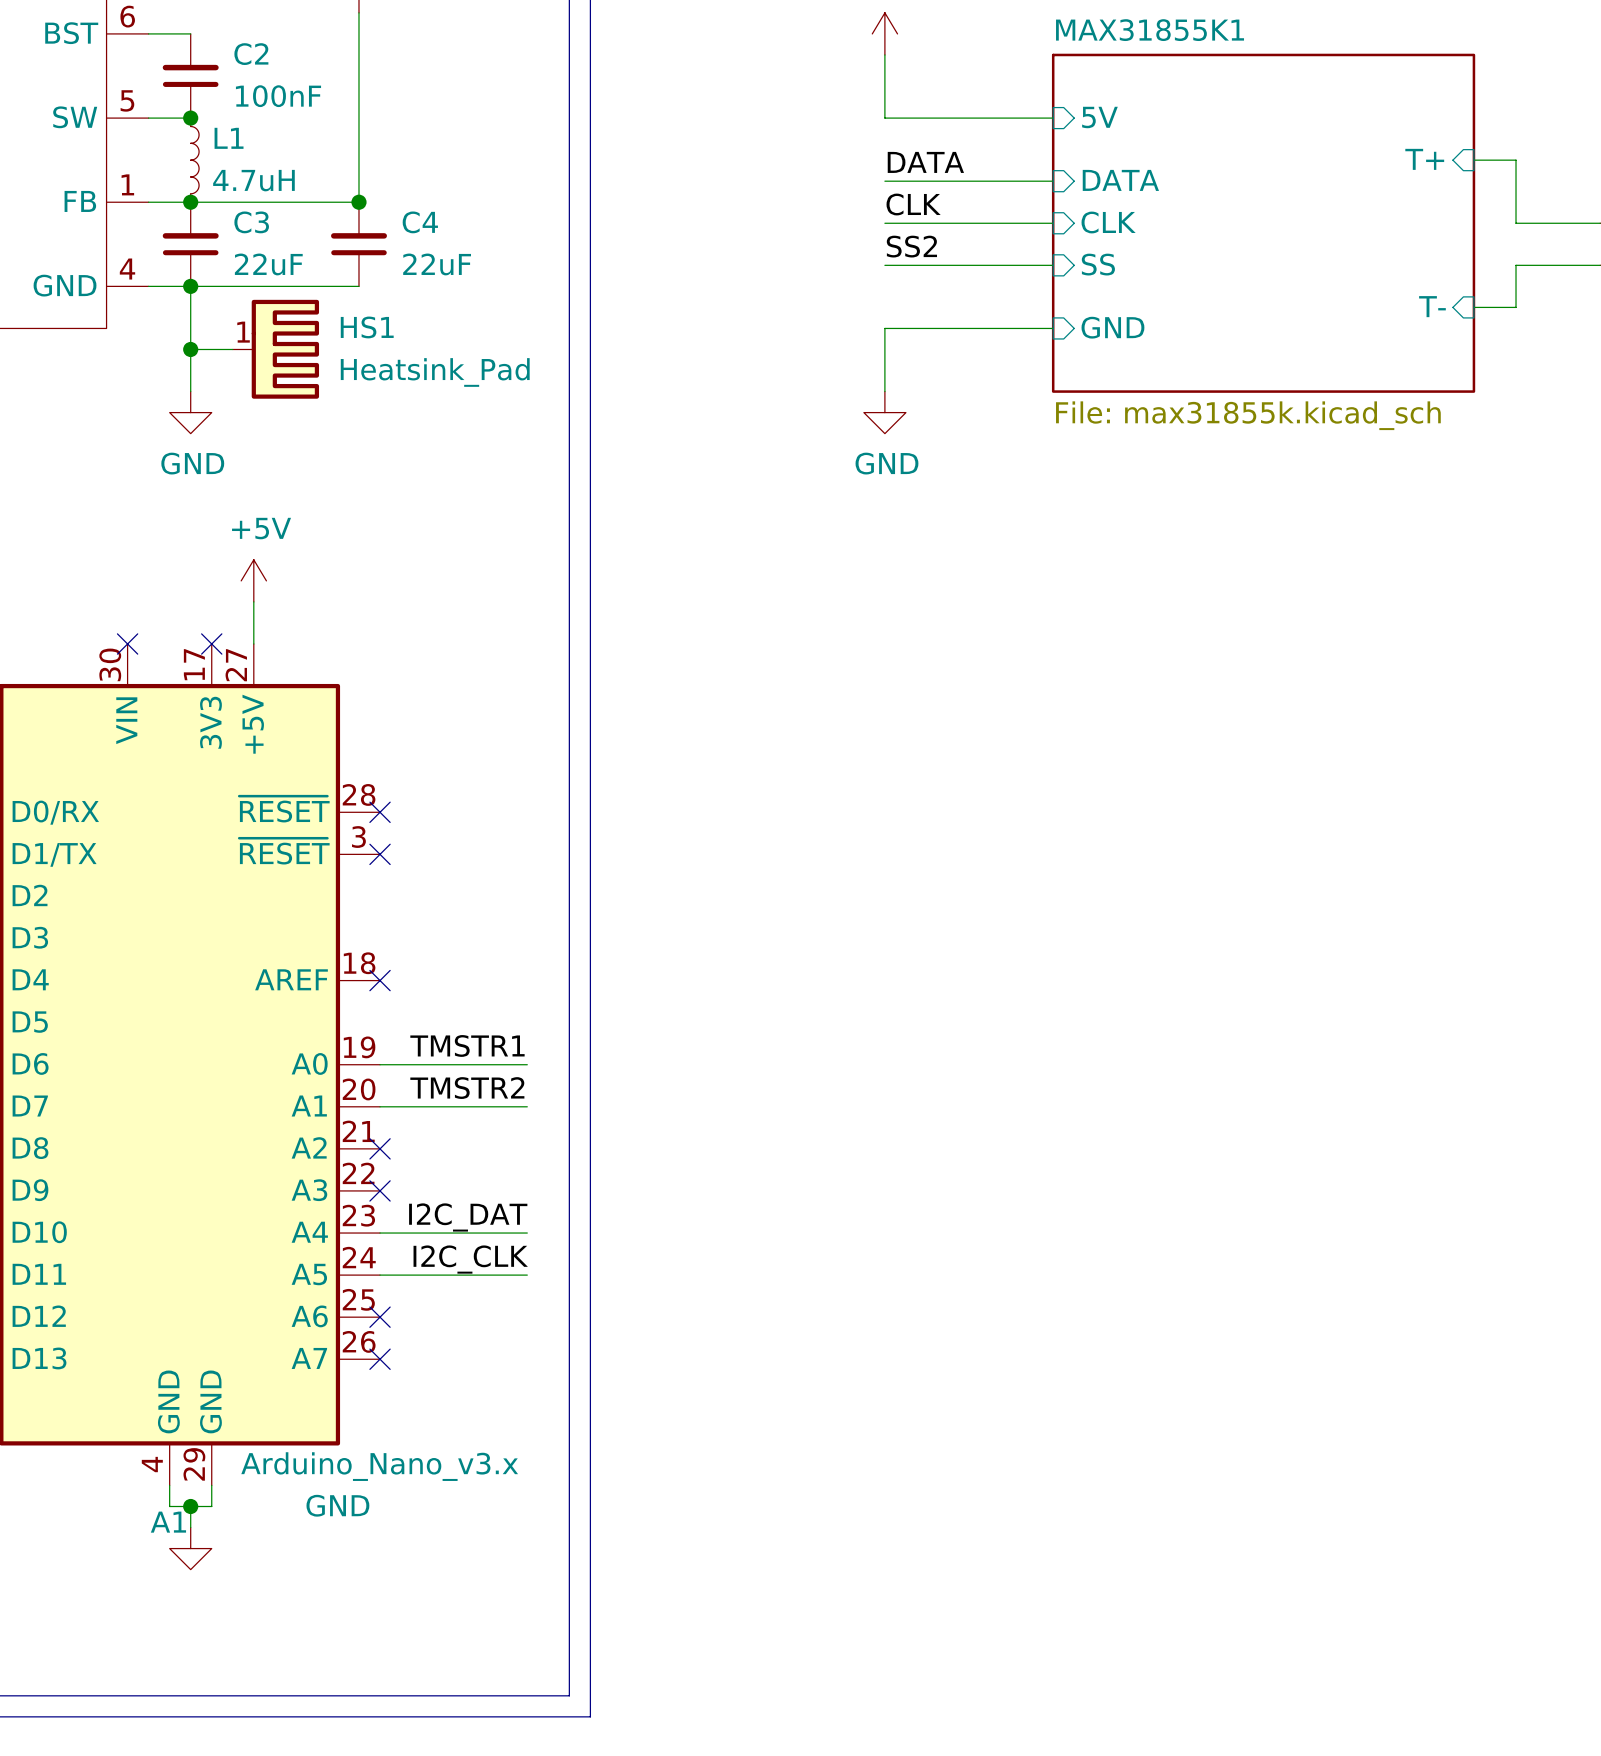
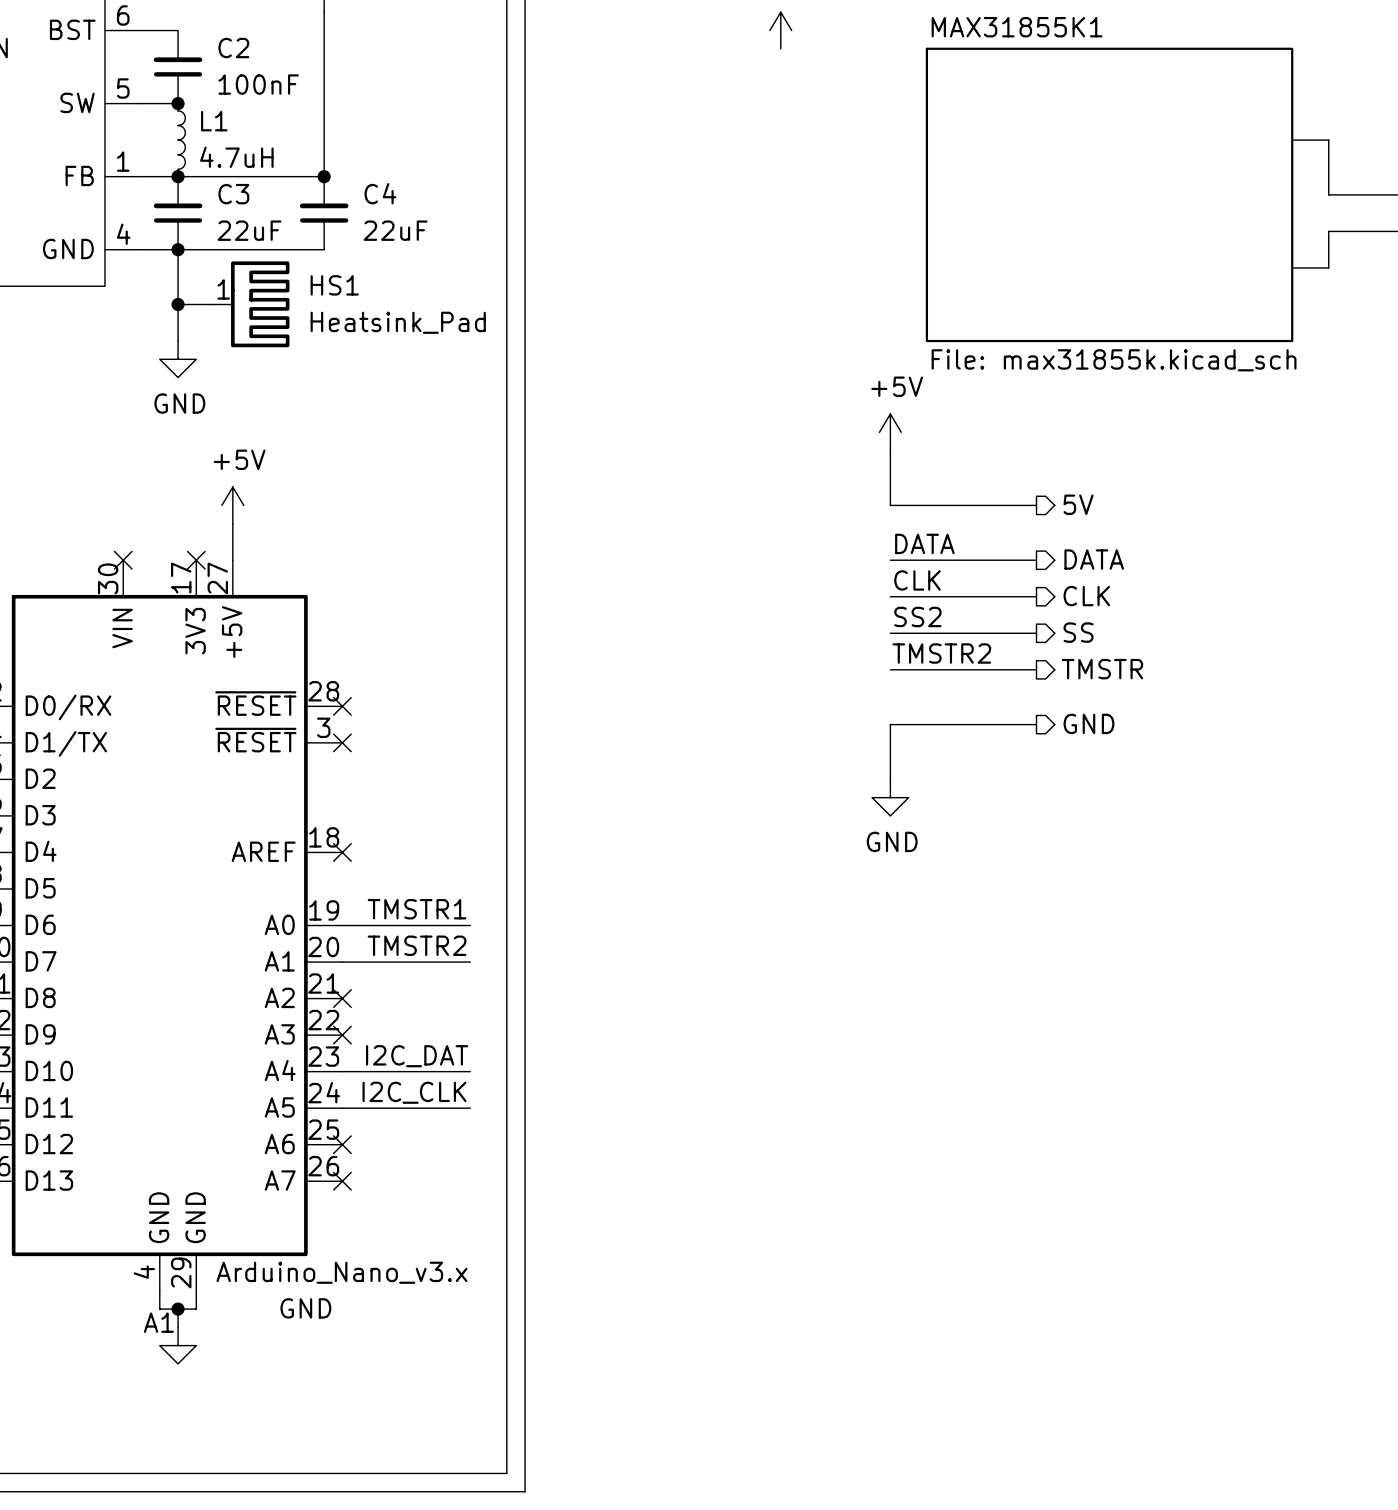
wire: (884, 54) (884, 118) (1053, 118) -> none
sheet pin: 5V (1099, 117) -> none
sheet pin: T+ (1424, 159) -> none
label: DATA (925, 162) -> none
sheet pin: DATA (1120, 180) -> none
wire: (884, 181) (1053, 181) -> none
label: CLK (913, 204) -> none
sheet pin: CLK (1108, 222) -> none
wire: (884, 223) (1053, 223) -> none
label: SS2 (911, 246) -> none
sheet pin: SS (1098, 264) -> none
wire: (884, 265) (1053, 265) -> (890, 560) (1036, 560)
sheet pin: T- (1432, 306) -> none
sheet pin: GND (1112, 327) -> none
wire: (1053, 328) (884, 328) (884, 391) -> none
power symbol: GND (884, 412) -> none
power symbol: none -> +5V (890, 432)
wire: none -> (890, 450) (890, 505) (1036, 505)
sheet pin: none -> 5V (1078, 504)
label: none -> DATA (924, 543)
sheet pin: none -> DATA (1094, 559)
label: none -> CLK (917, 580)
sheet pin: none -> CLK (1086, 596)
wire: none -> (890, 596) (1036, 596)
label: none -> SS2 (917, 616)
sheet pin: none -> SS (1078, 632)
wire: none -> (890, 633) (1036, 633)
label: none -> TMSTR2 (941, 653)
sheet pin: none -> TMSTR (1102, 669)
wire: none -> (890, 669) (1036, 669)
sheet pin: none -> GND (1088, 723)
wire: none -> (1036, 724) (890, 724) (890, 779)
power symbol: none -> GND (890, 797)

